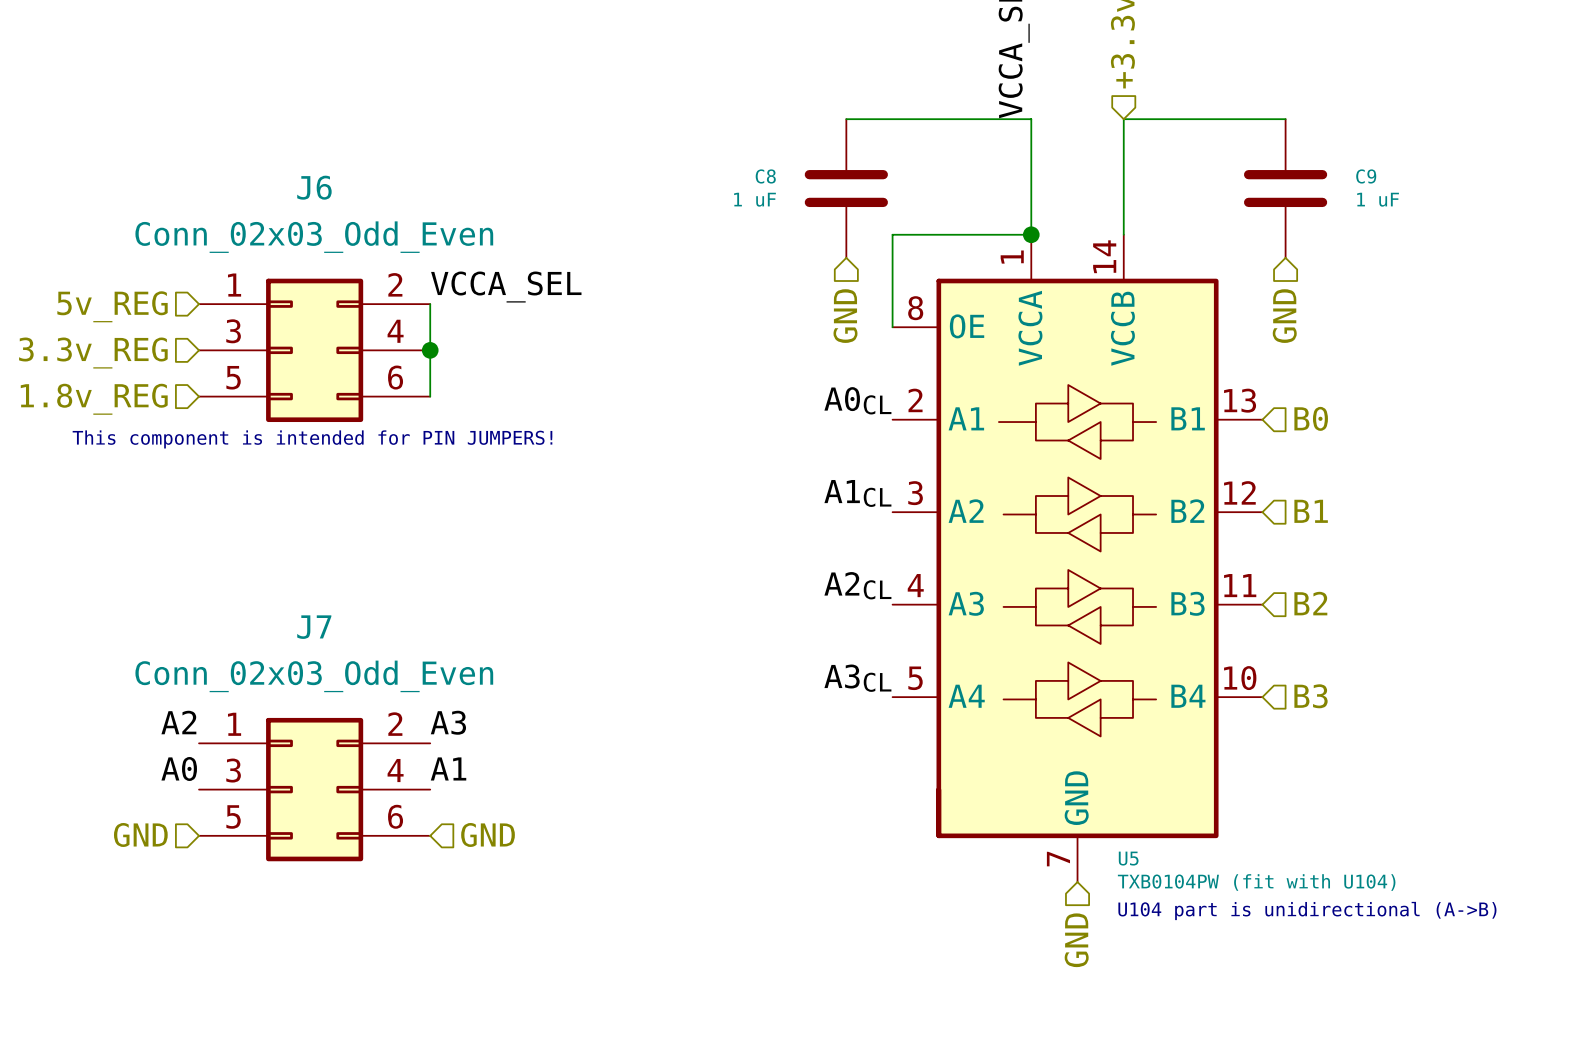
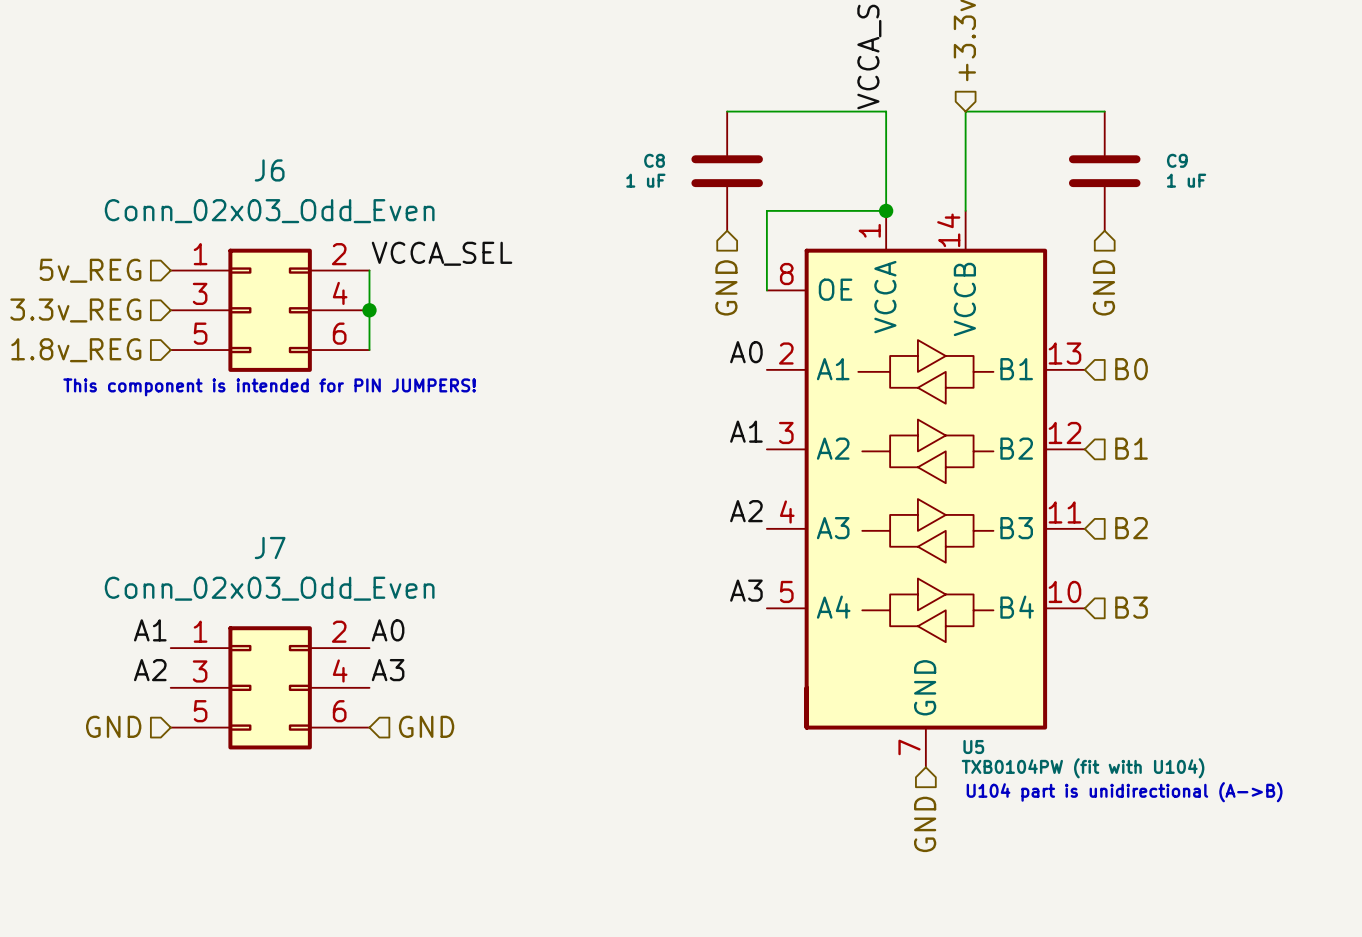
label: A0CL (857, 400) -> A0 (746, 352)
label: A1CL (857, 493) -> A1 (746, 431)
label: A2CL (857, 585) -> A2 (746, 511)
label: A3CL (857, 678) -> A3 (746, 590)
label: A2 (178, 722) -> A1 (150, 630)
label: A3 (448, 722) -> A0 (388, 630)
label: A0 (179, 768) -> A2 (150, 670)
label: A1 (448, 768) -> A3 (388, 670)

